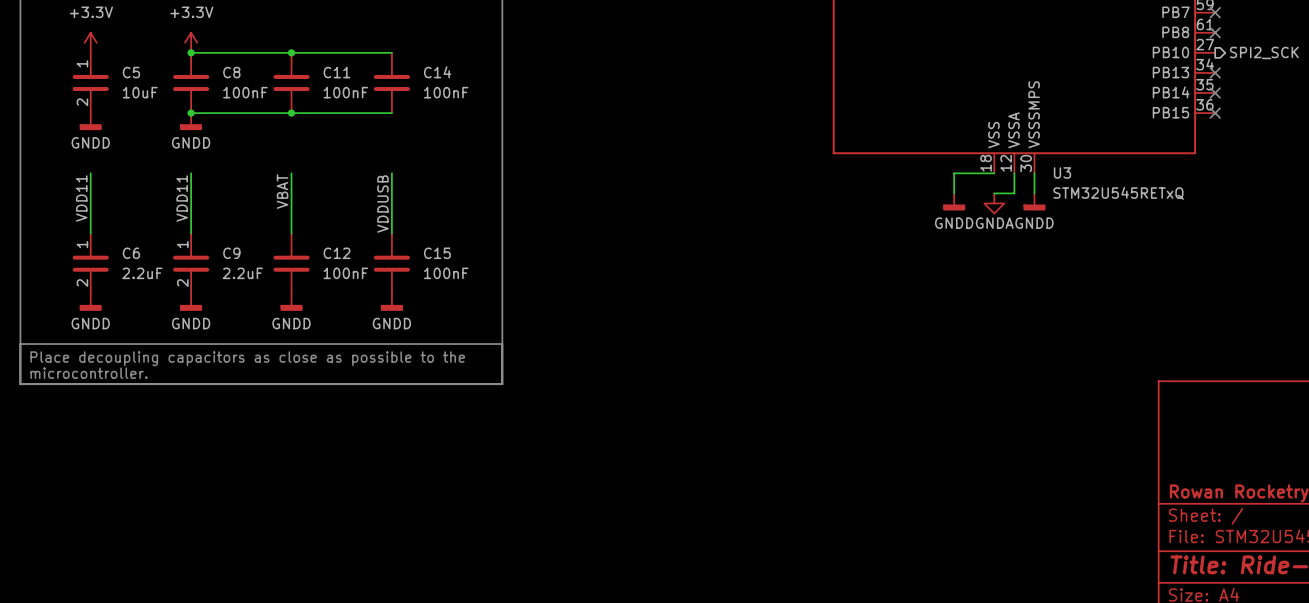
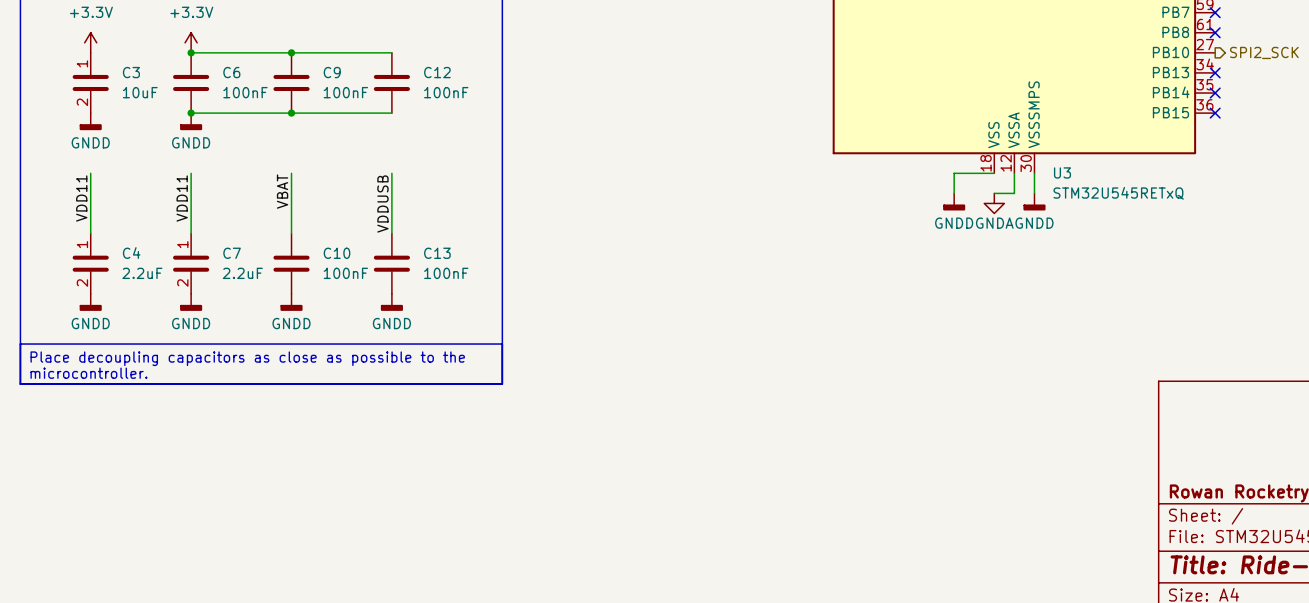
C5 name: C5 (131, 72) -> C3 (131, 72)
C8 name: C8 (231, 72) -> C6 (231, 72)
C11 name: C11 (337, 72) -> C9 (332, 72)
C14 name: C14 (437, 72) -> C12 (437, 72)
C6 name: C6 (131, 253) -> C4 (131, 253)
C9 name: C9 (231, 253) -> C7 (232, 253)
C12 name: C12 (337, 253) -> C10 (337, 253)
C15 name: C15 (437, 253) -> C13 (437, 253)

